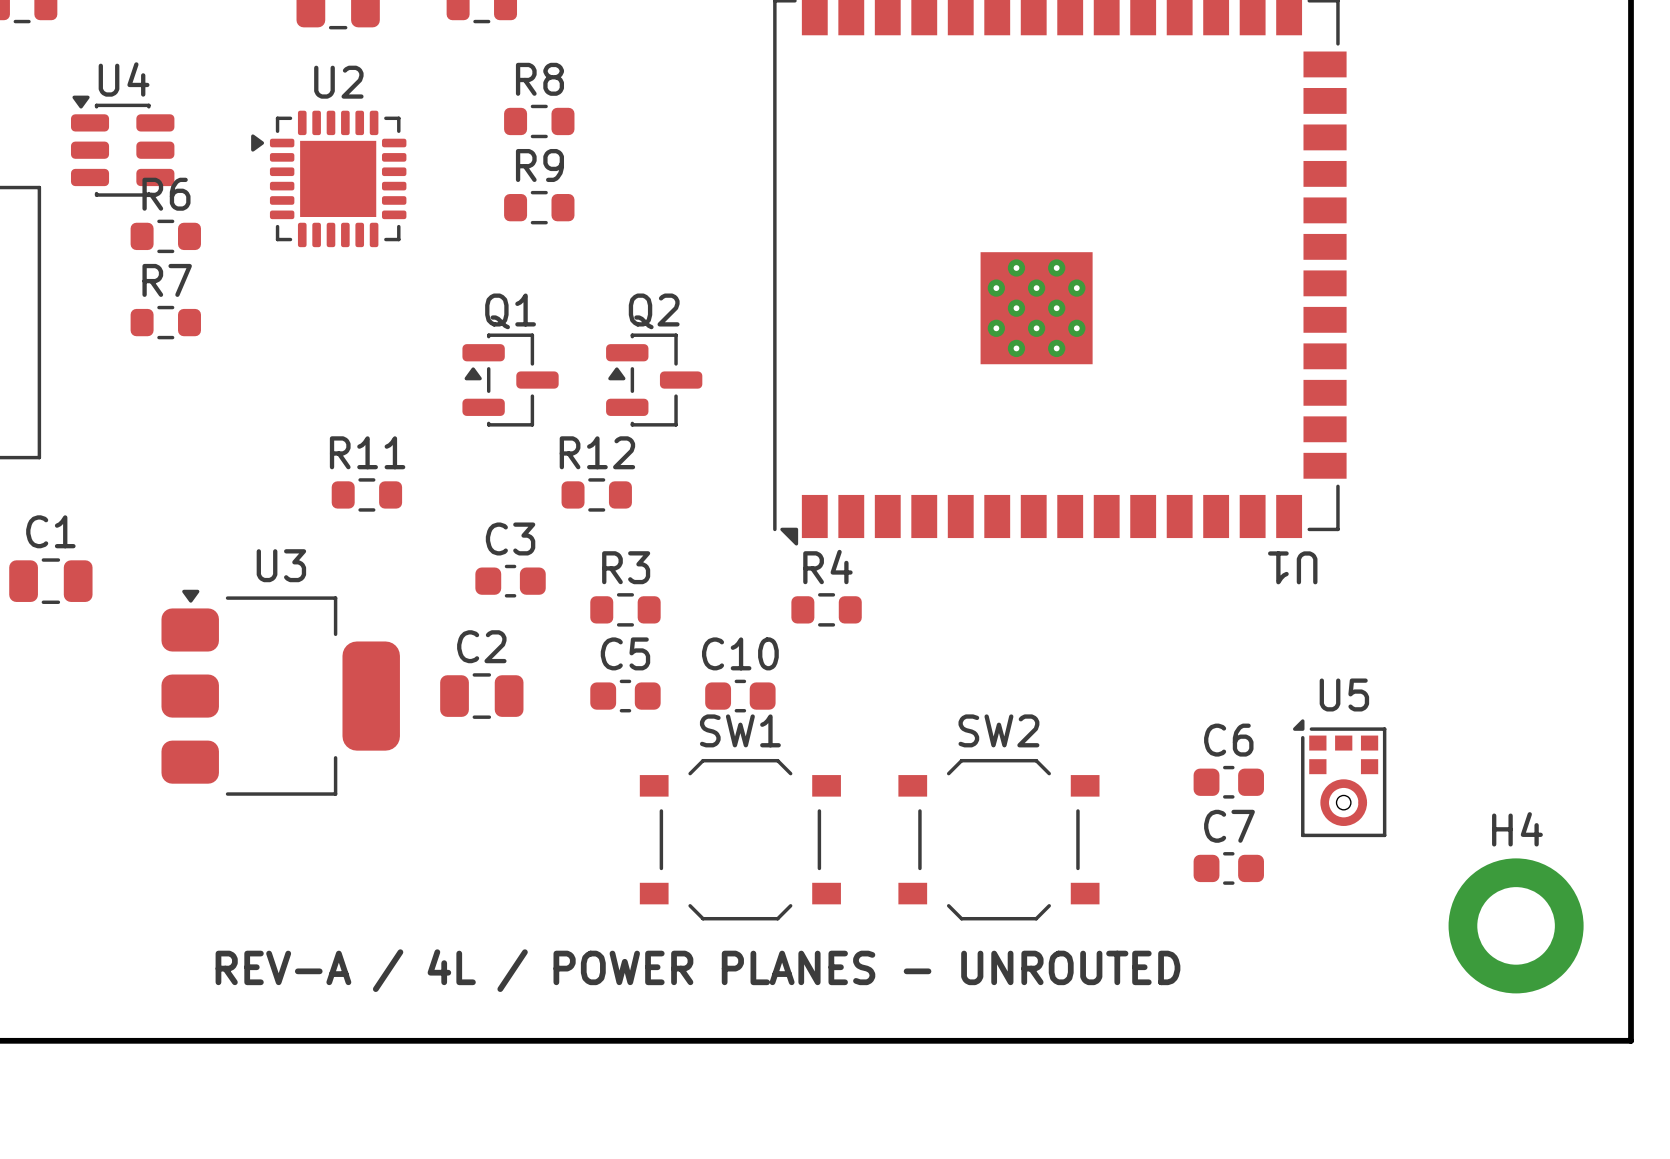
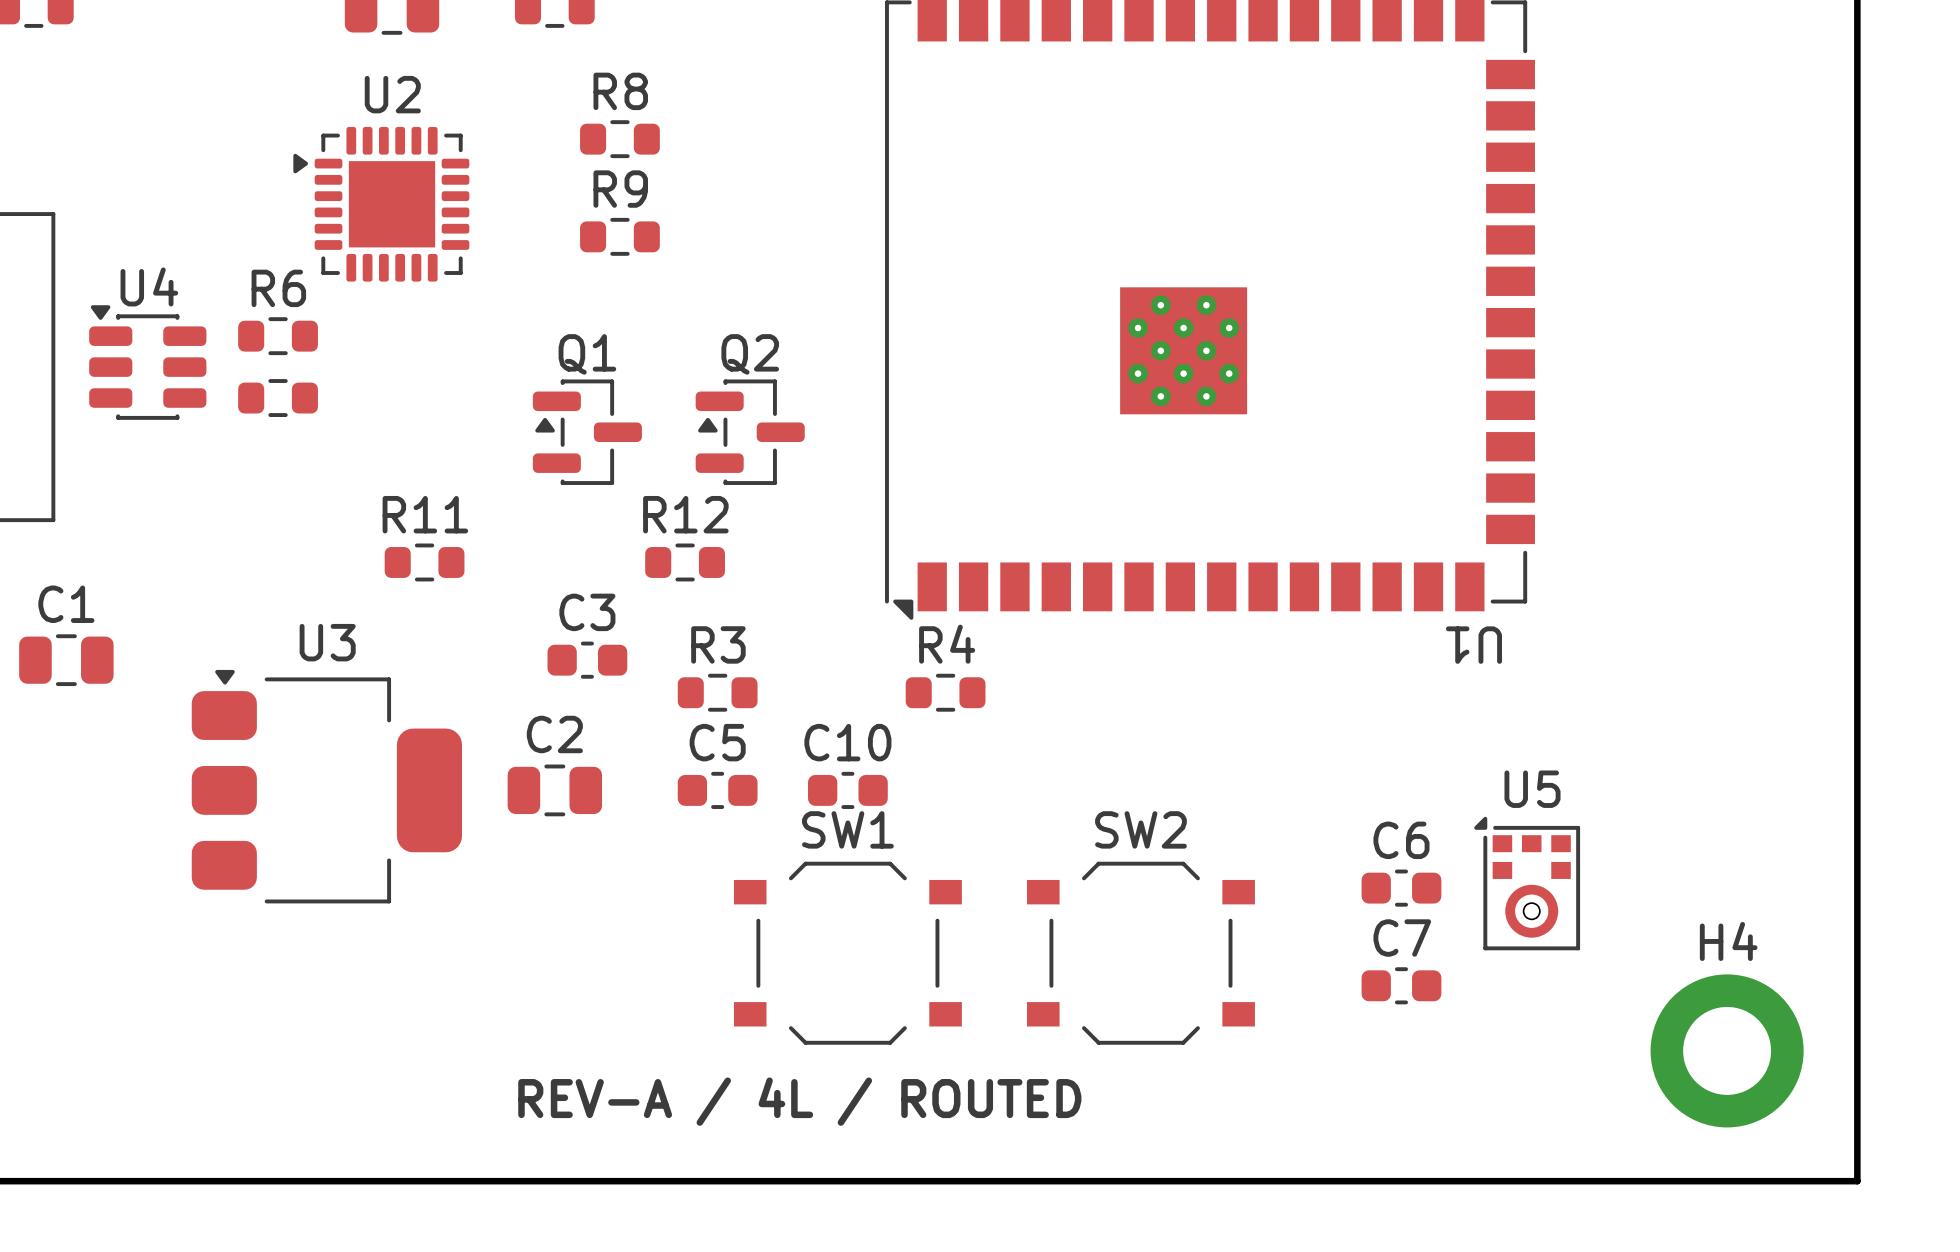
U4 position: (122, 146) -> (147, 362)
R6 position: (165, 236) -> (278, 336)
R7: (165, 322) -> none
part: none -> (278, 398)
text: REV-A / 4L / POWER PLANES - UNROUTED (697, 970) -> REV-A / 4L / ROUTED (799, 1101)

